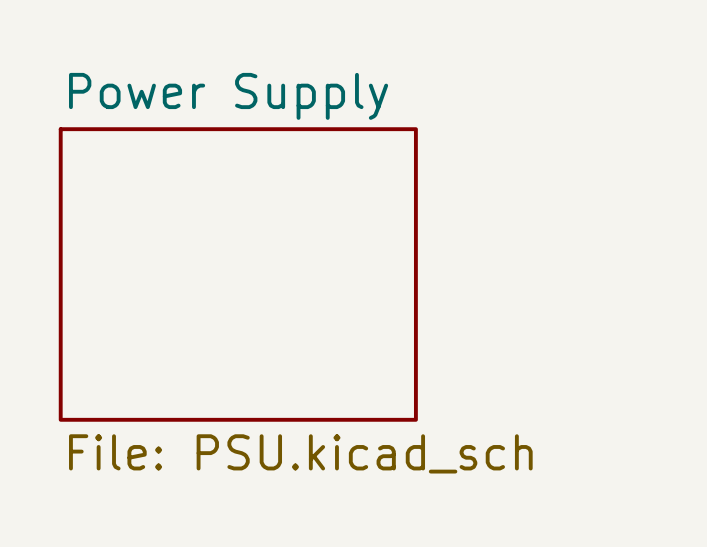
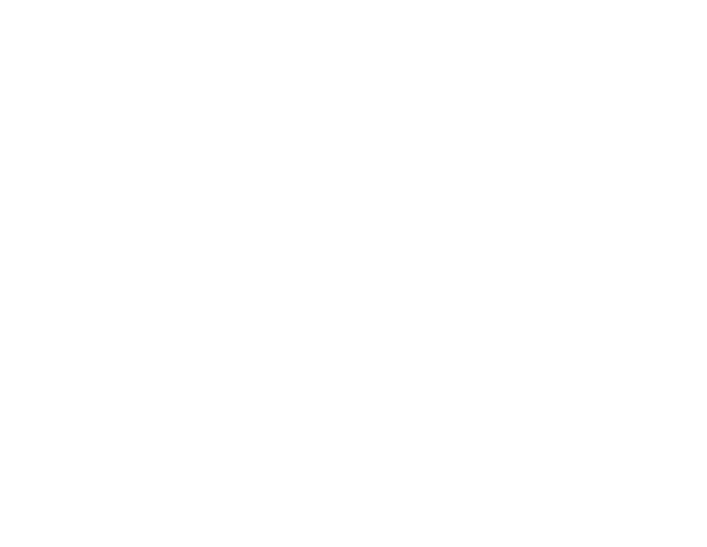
sheet Power Supply: File: PSU.kicad_sch (238, 274) -> none

